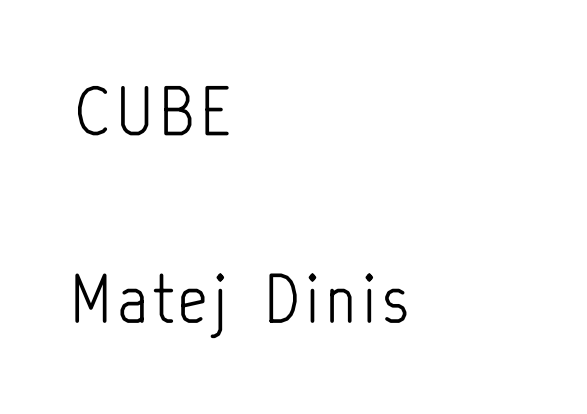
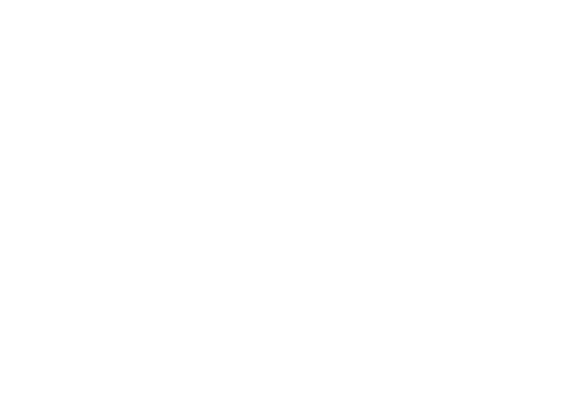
text: CUBE (153, 110) -> none
text: Matej Dinis (240, 305) -> none

